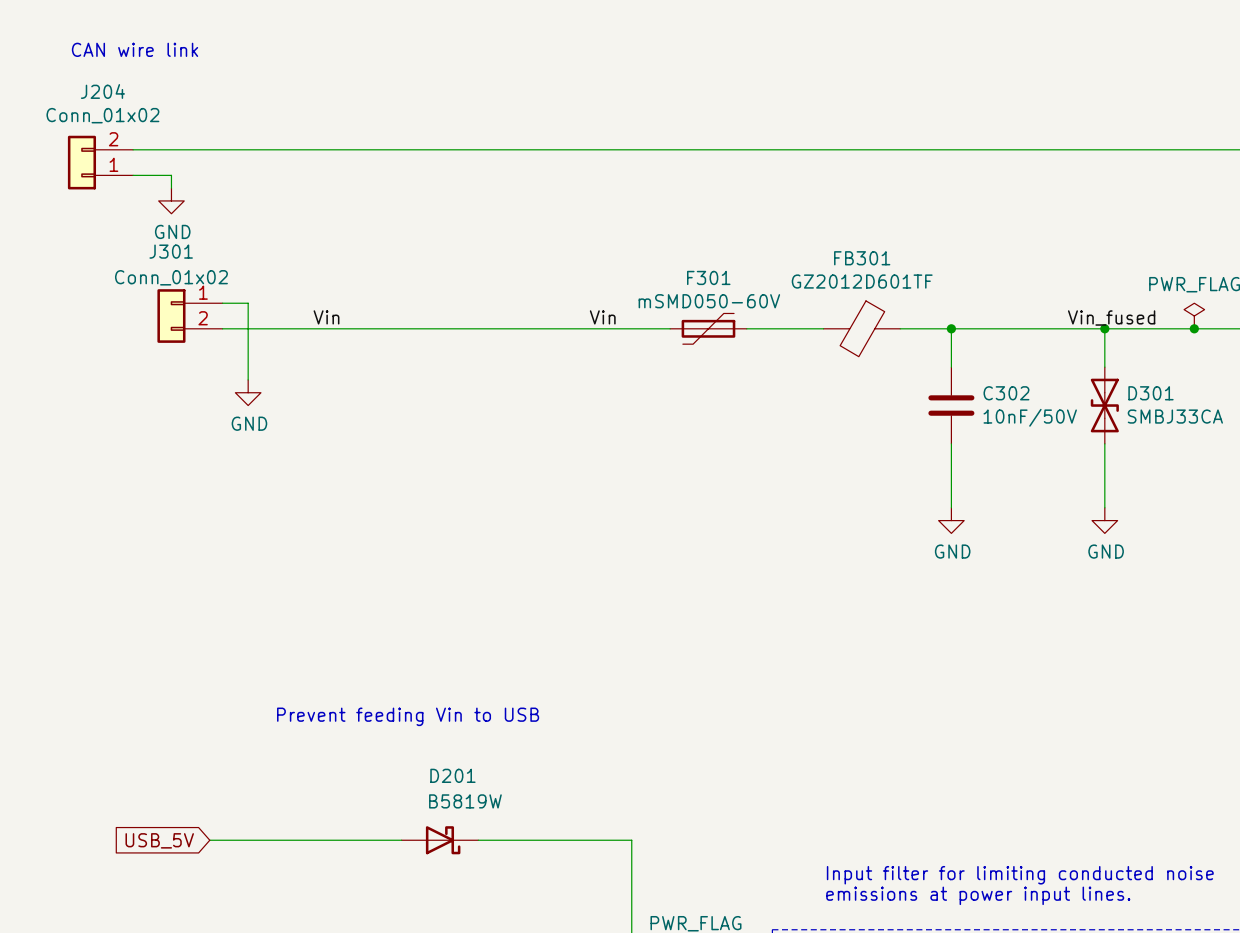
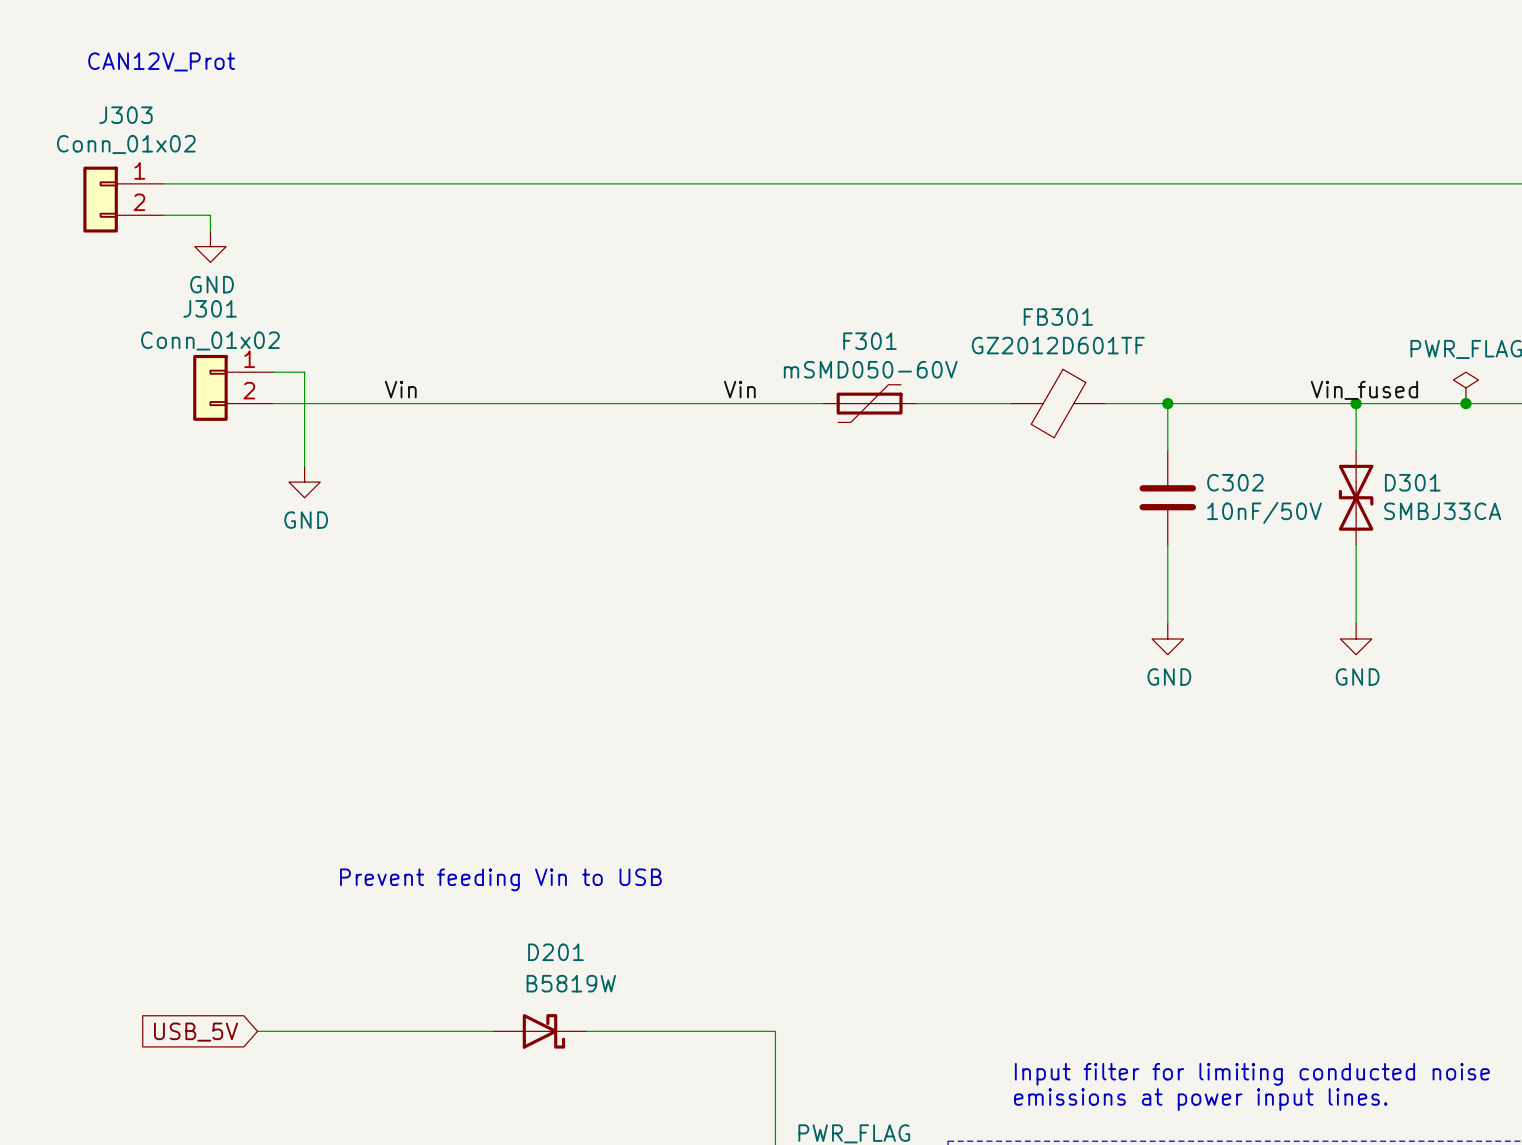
text: CAN wire link (135, 49) -> CAN12V_Prot (161, 61)
J204 name: J204 (102, 91) -> J303 (125, 115)
J204 flip: as is (81, 162) -> up-down (100, 199)

